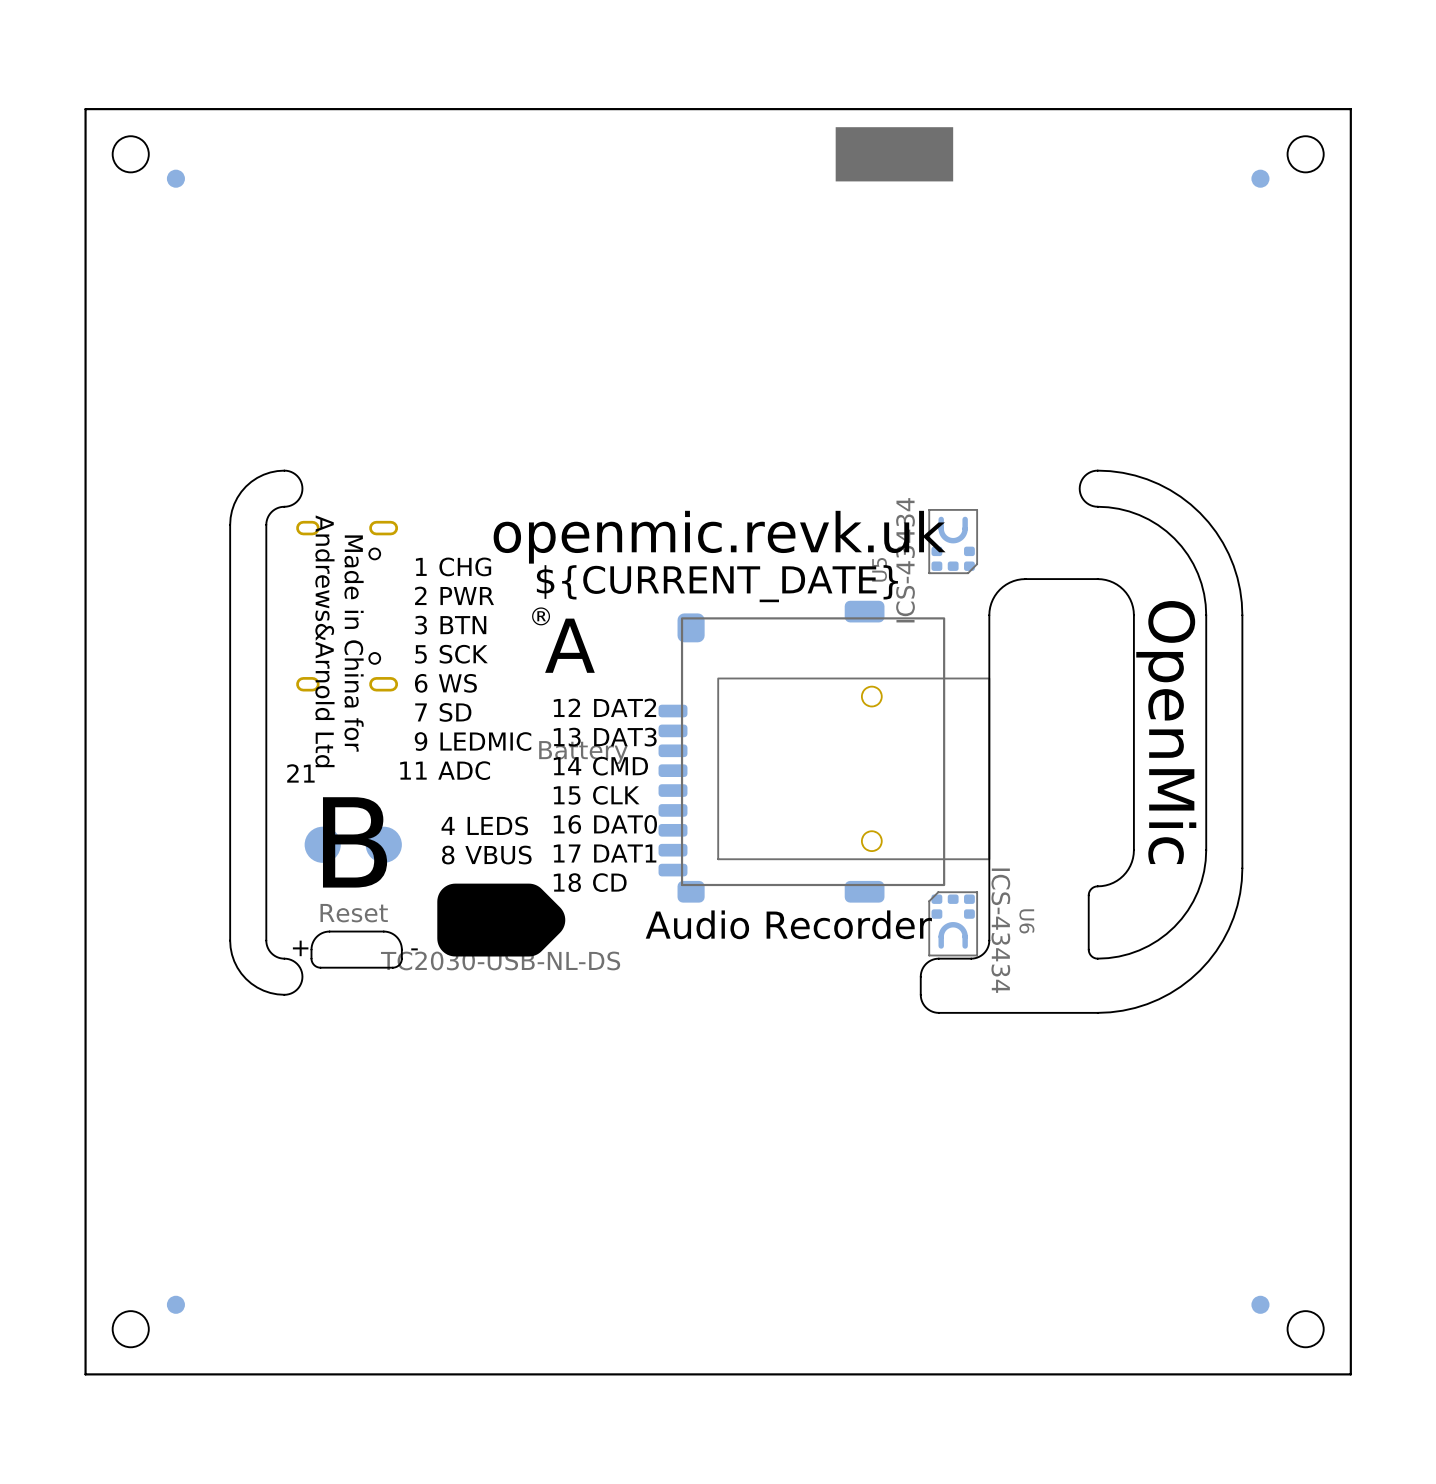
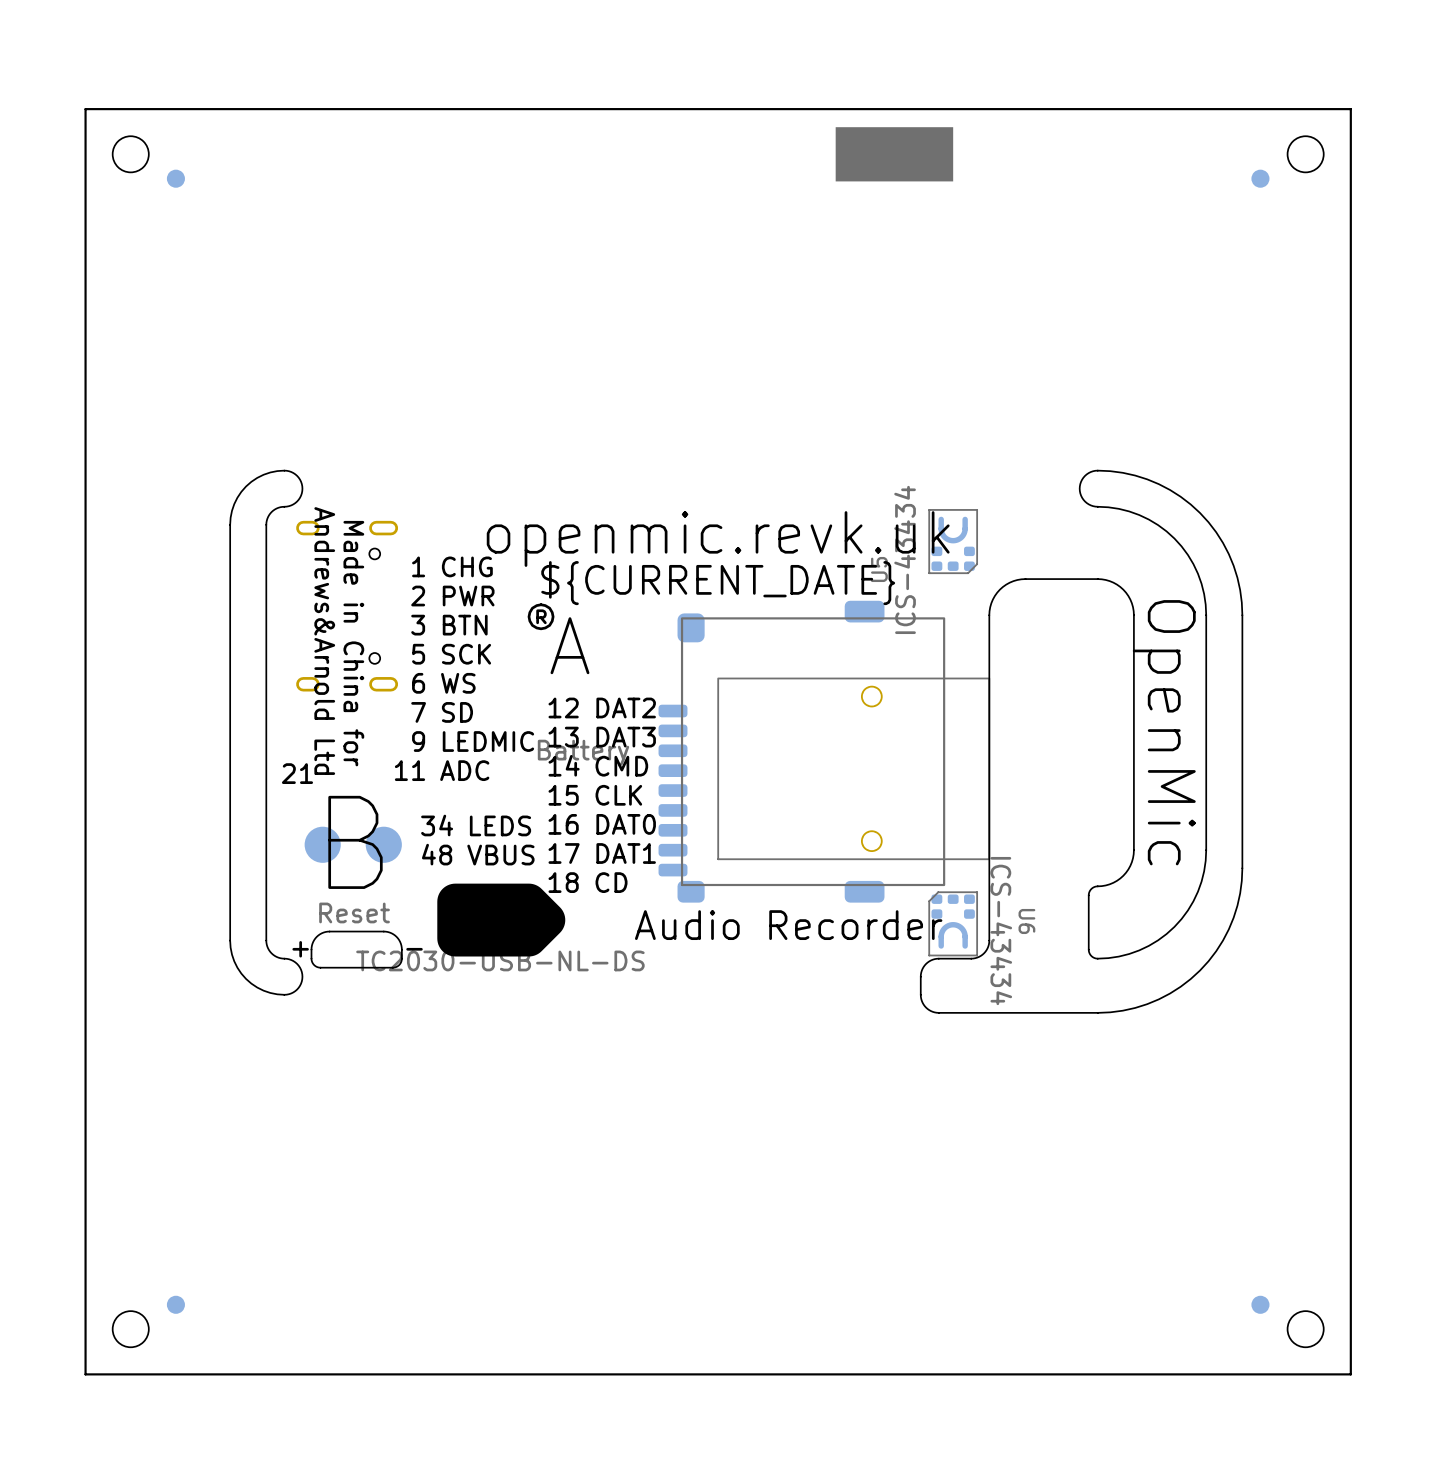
text: 4 (448, 825) -> 34 (437, 825)
text: 8 (448, 855) -> 48 (437, 854)

